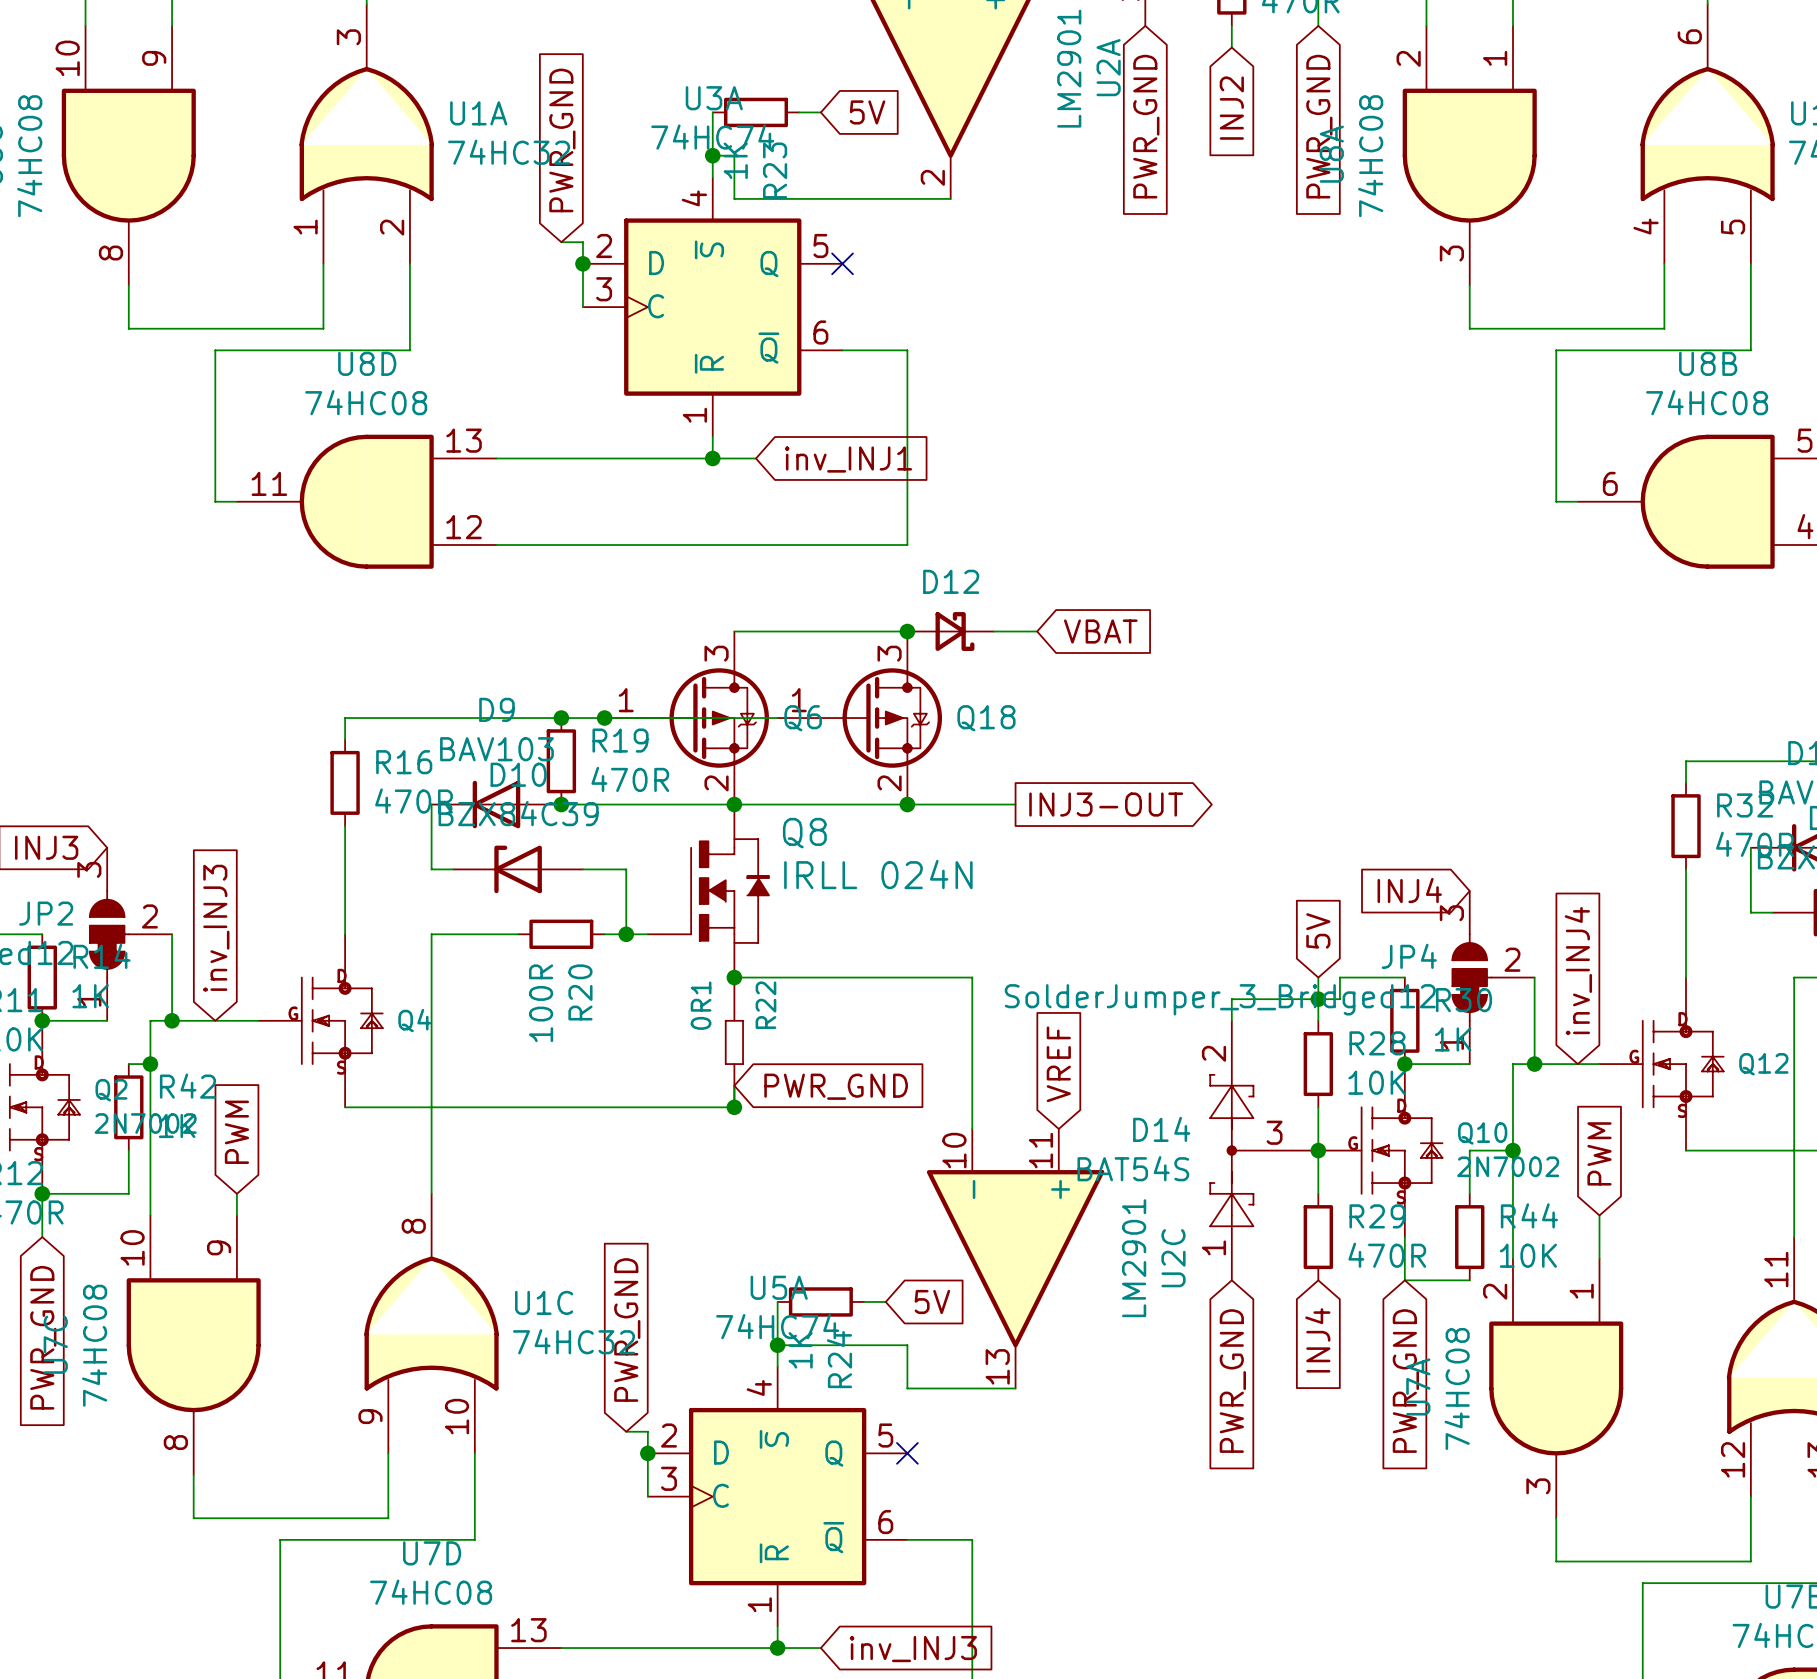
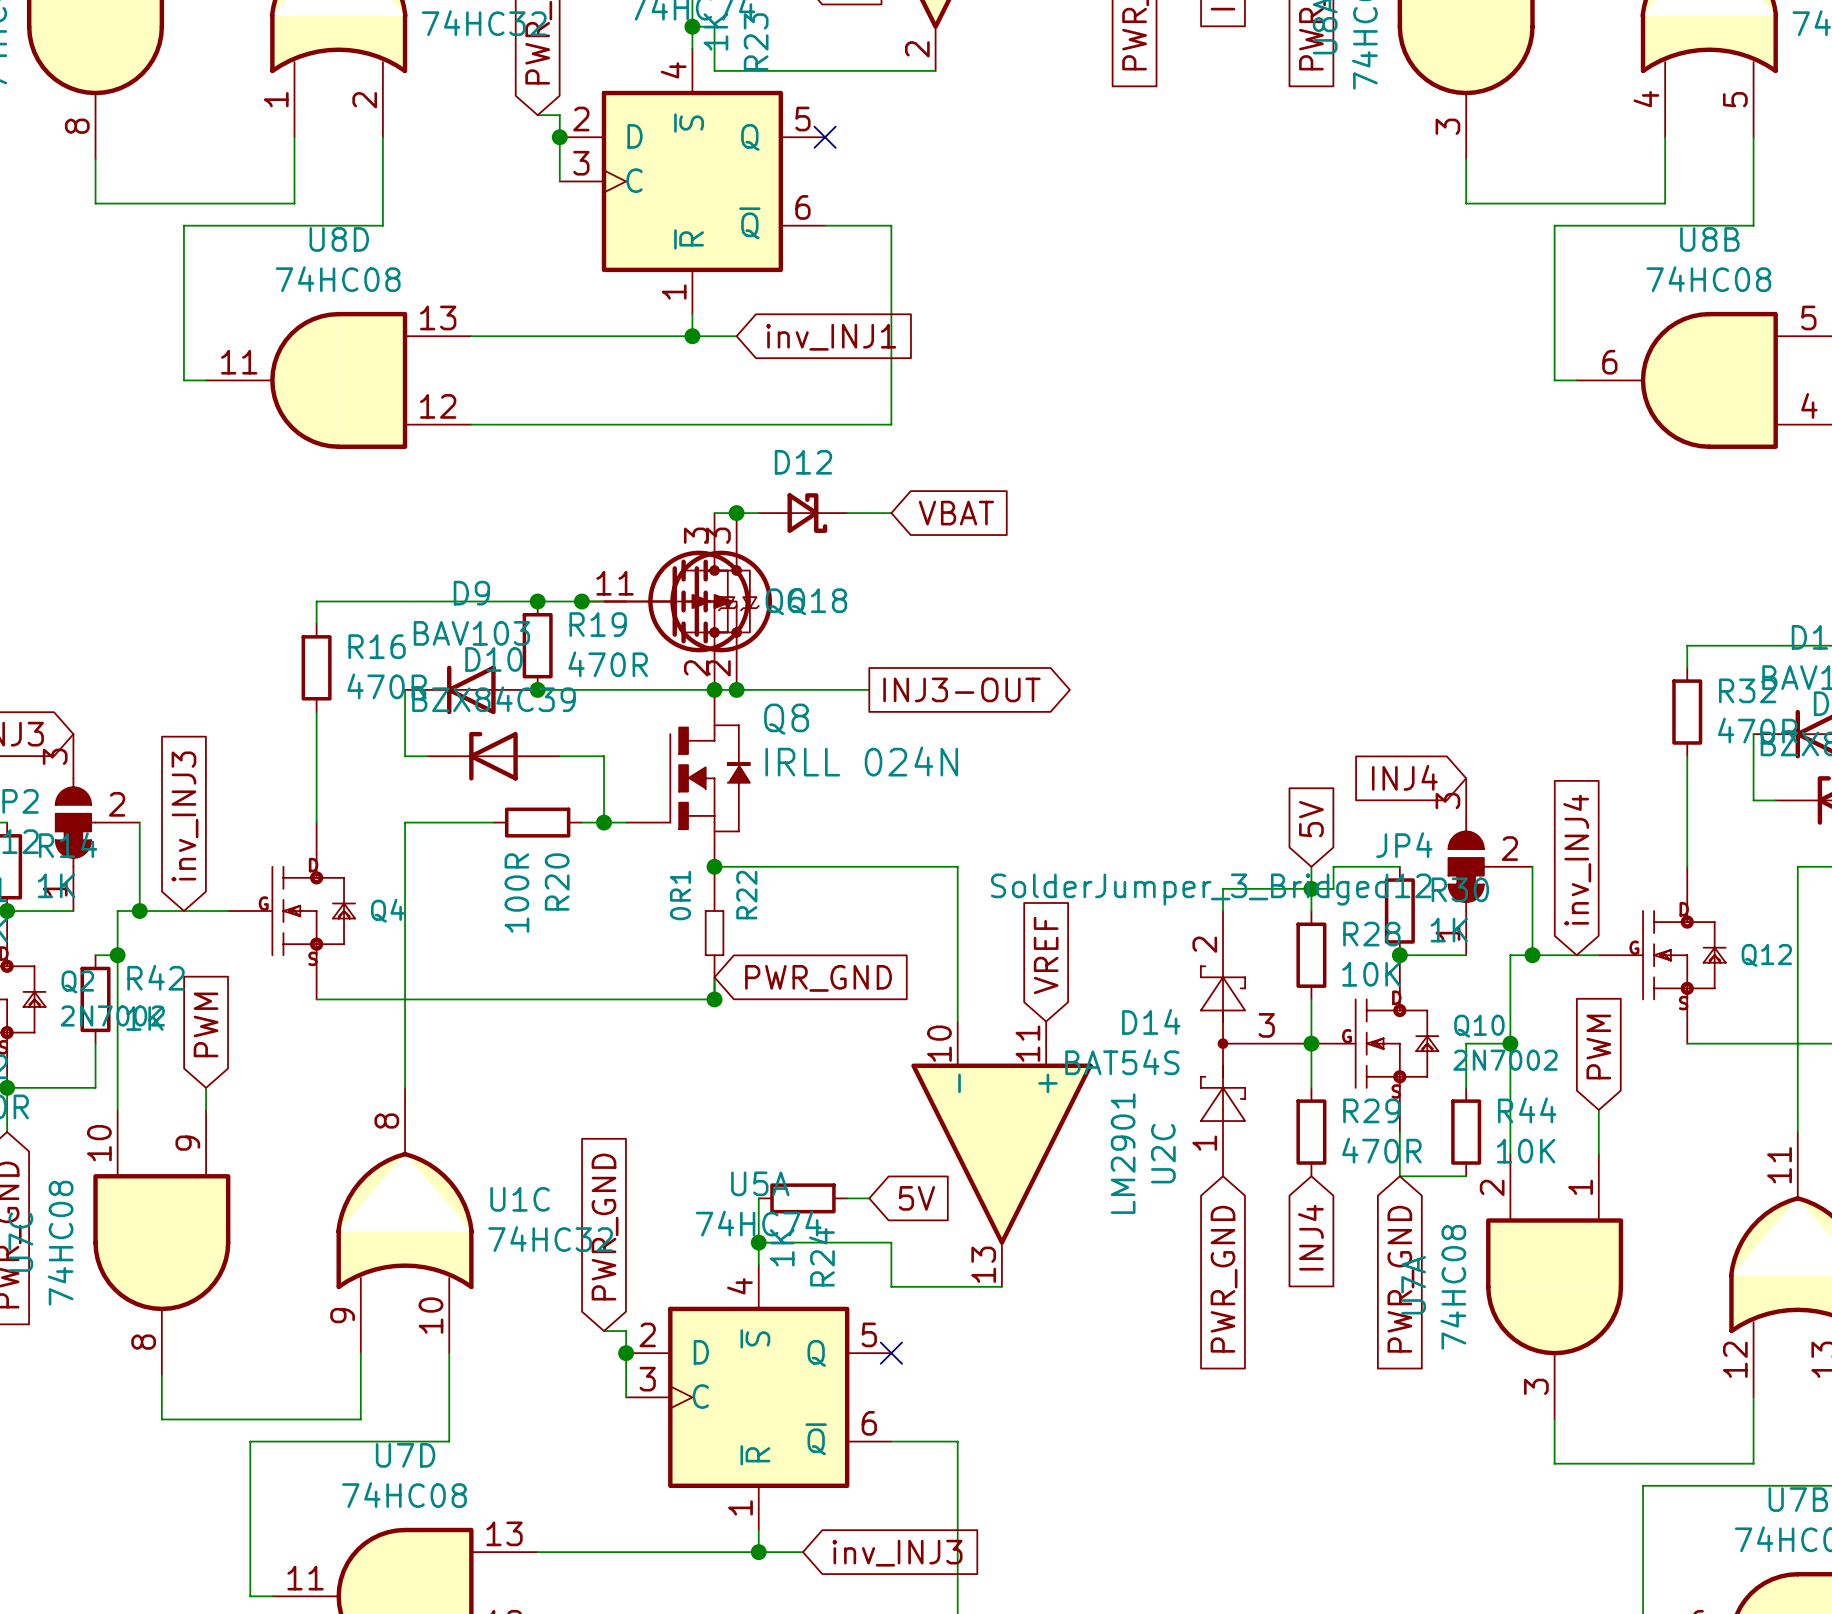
junction: none -> (736, 513)
junction: (907, 631) -> none
D12 position: (950, 631) -> (802, 513)
wire: (993, 631) (1037, 631) -> none
global label position: VBAT (1100, 631) -> VBAT (956, 513)
Q18 position: (859, 718) -> (688, 601)
junction: none -> (736, 689)
wire: (885, 804) (1015, 804) -> none
junction: (907, 804) -> none
global label position: INJ3-OUT (1106, 804) -> INJ3-OUT (961, 689)

